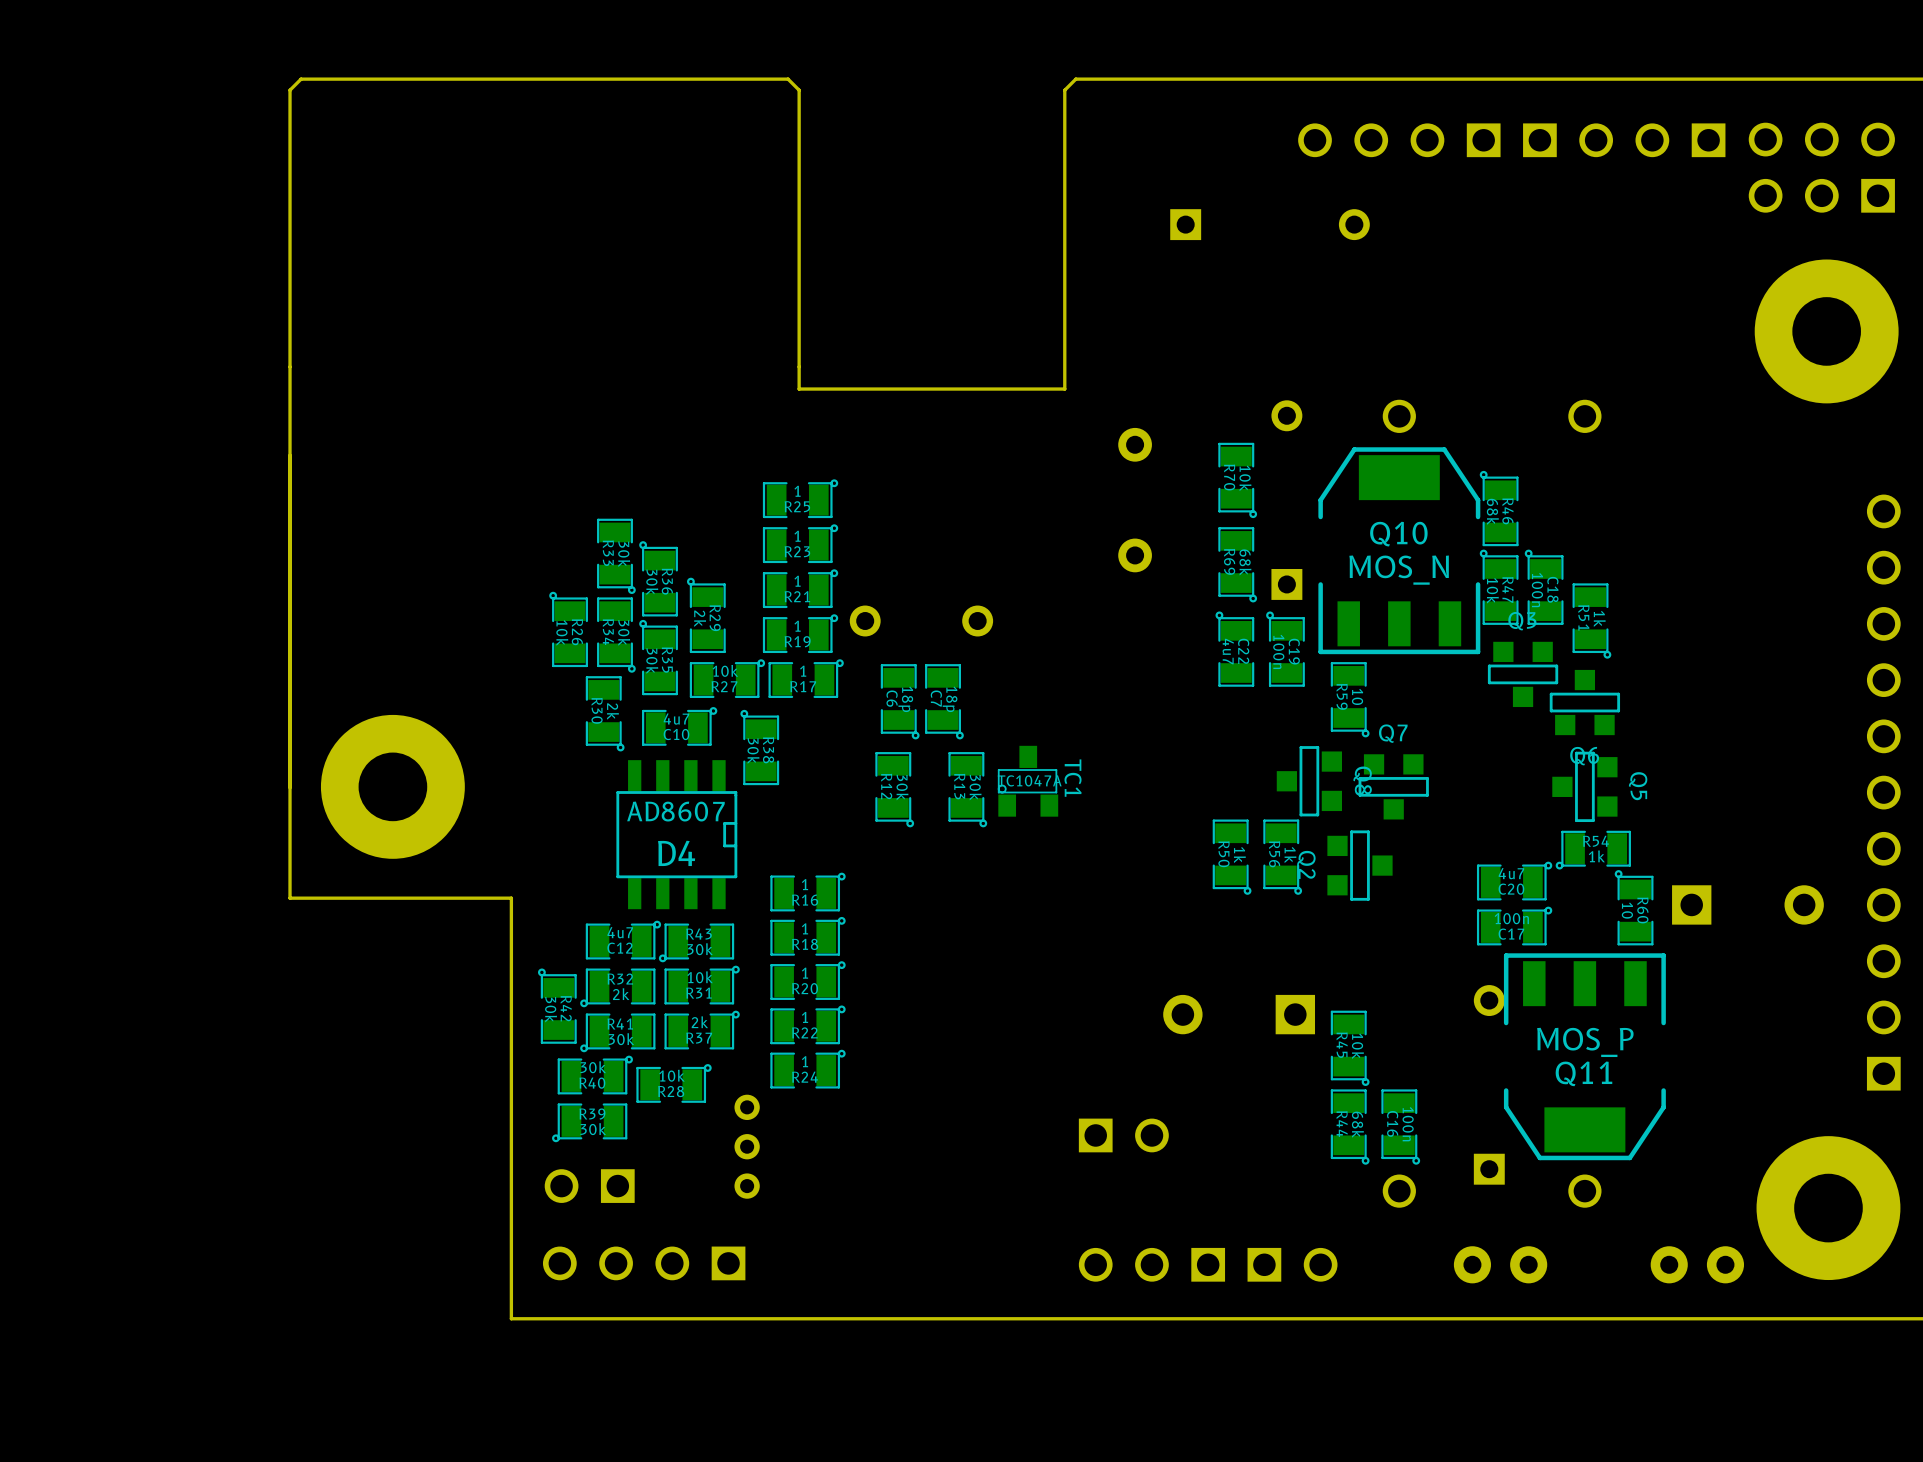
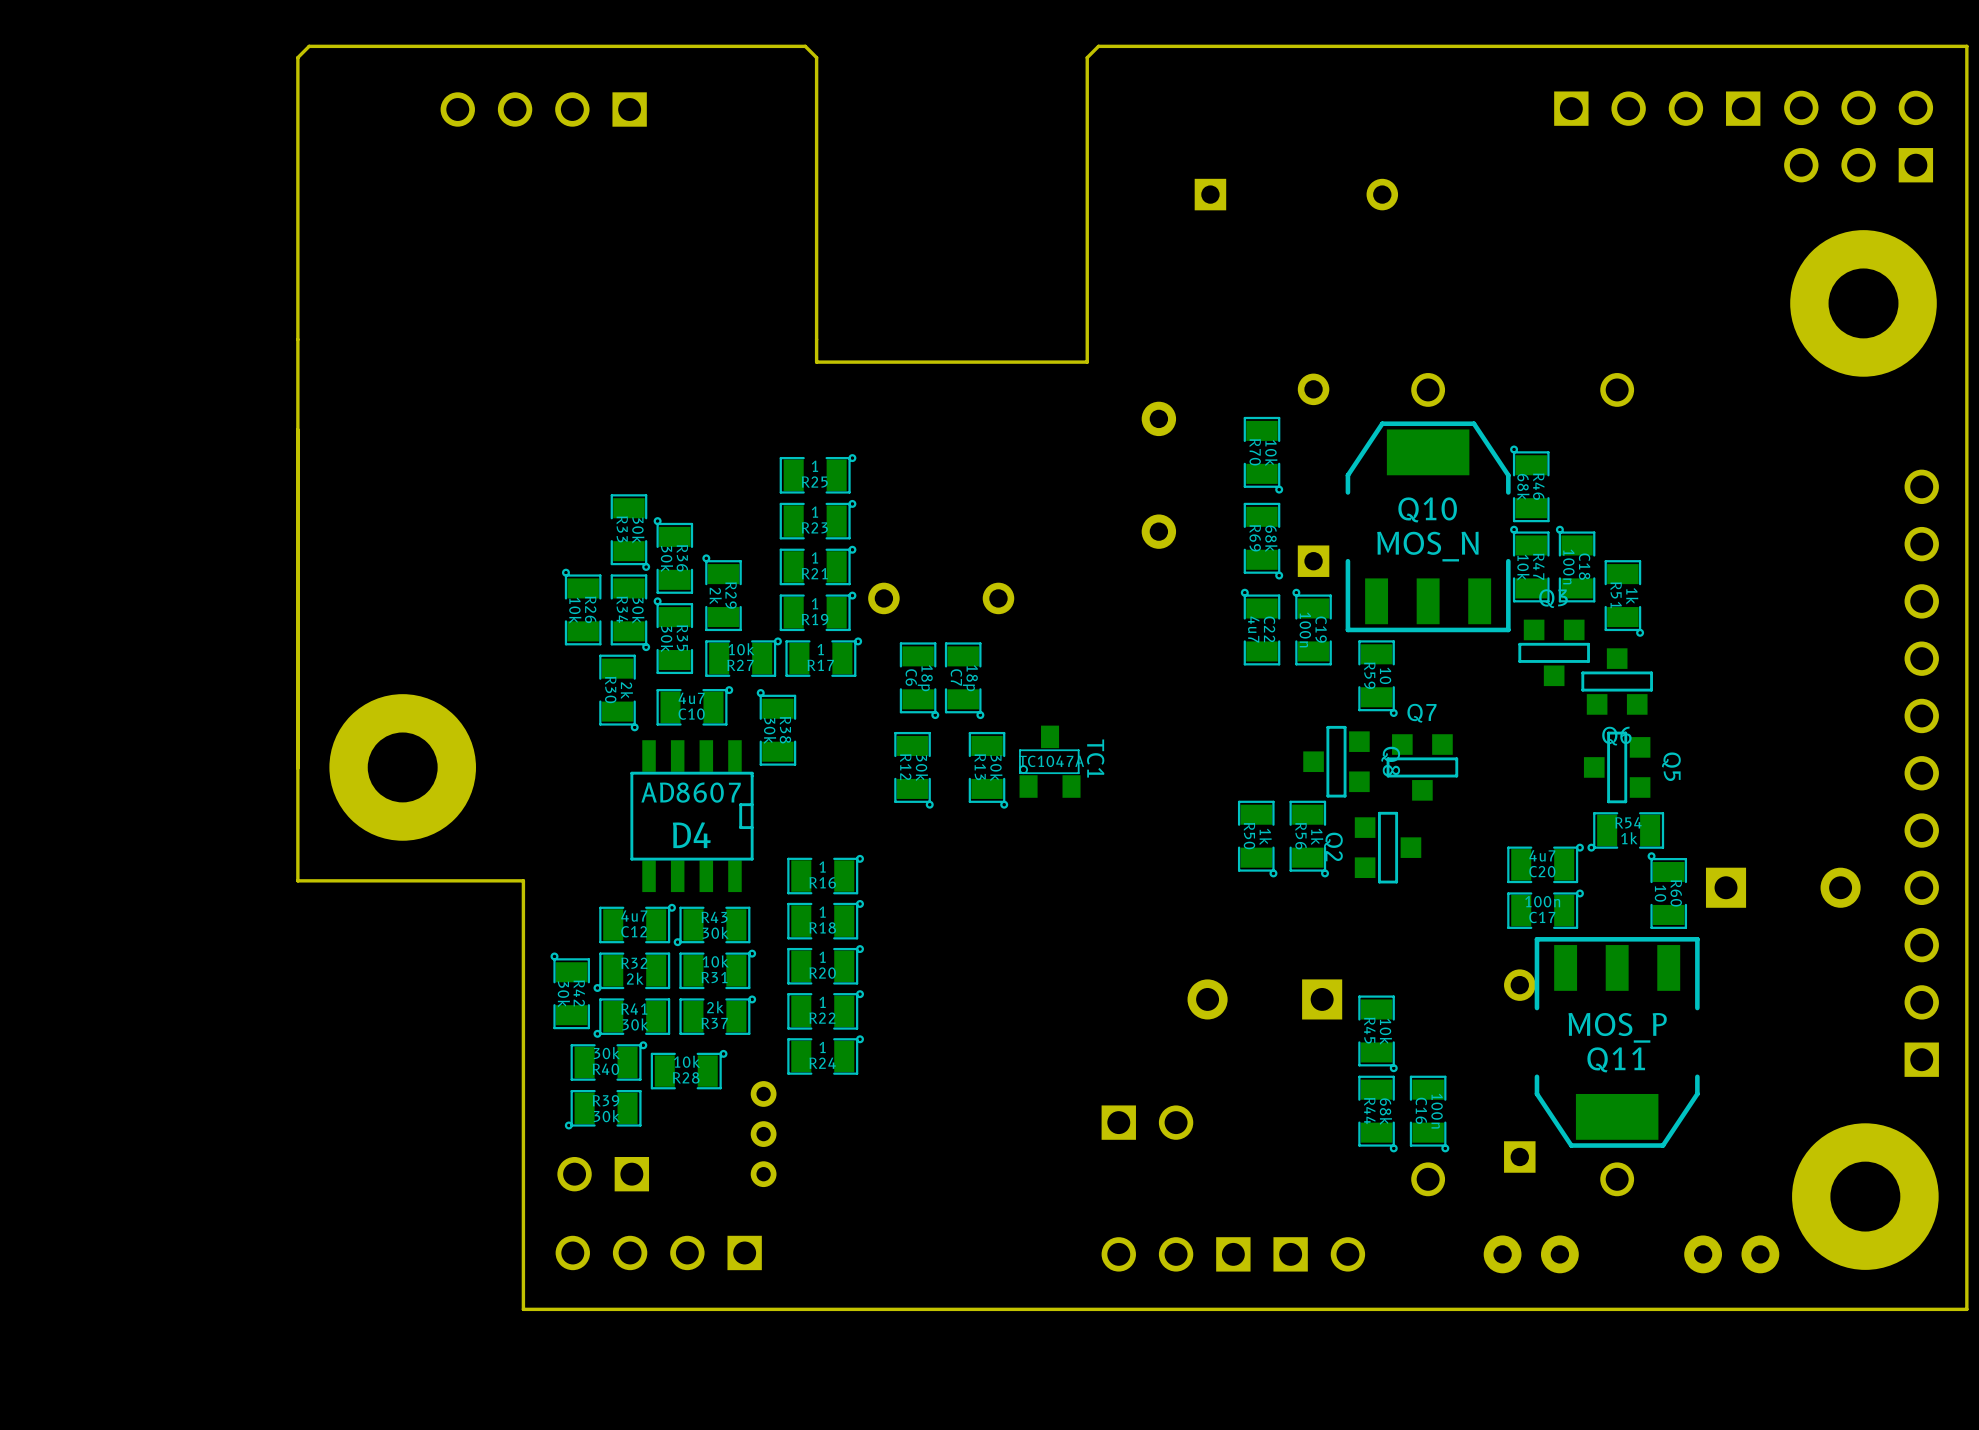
part: (1399, 140) -> none
part: none -> (543, 109)

